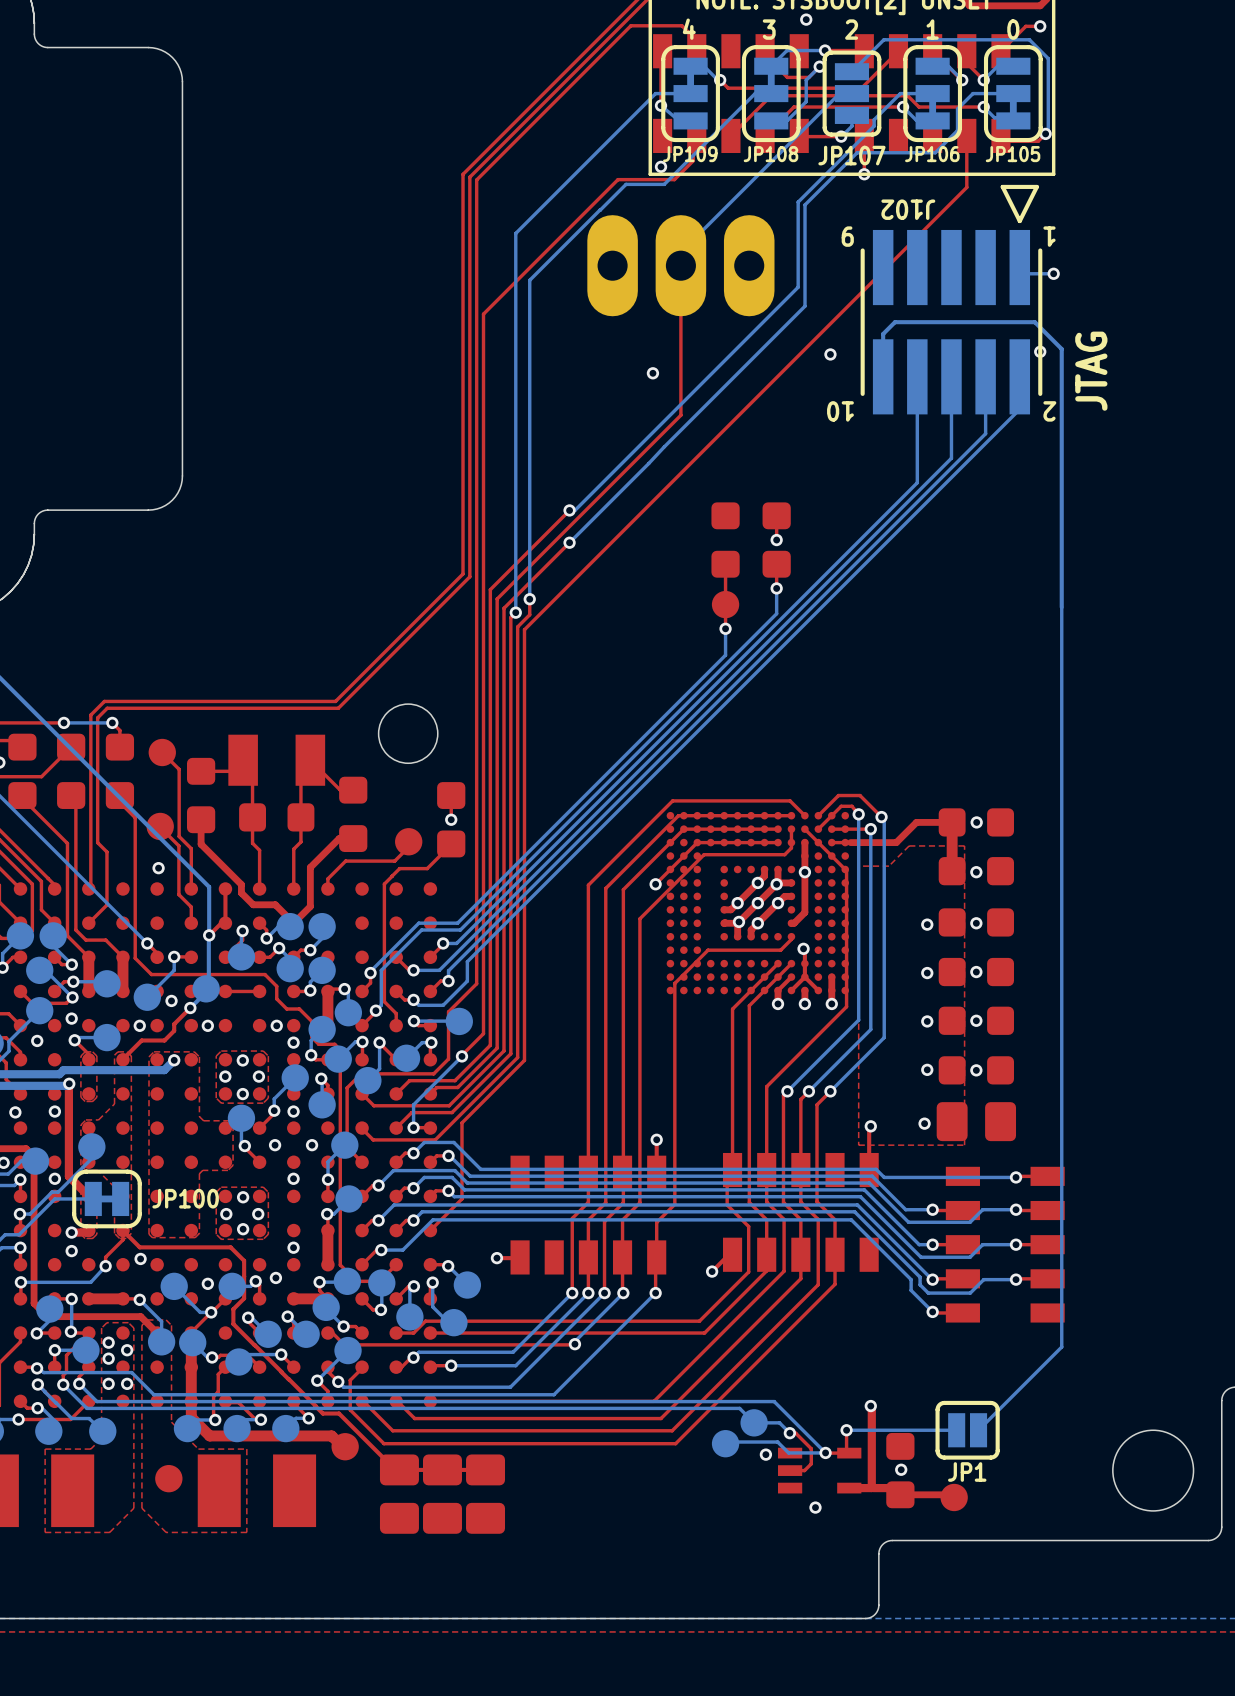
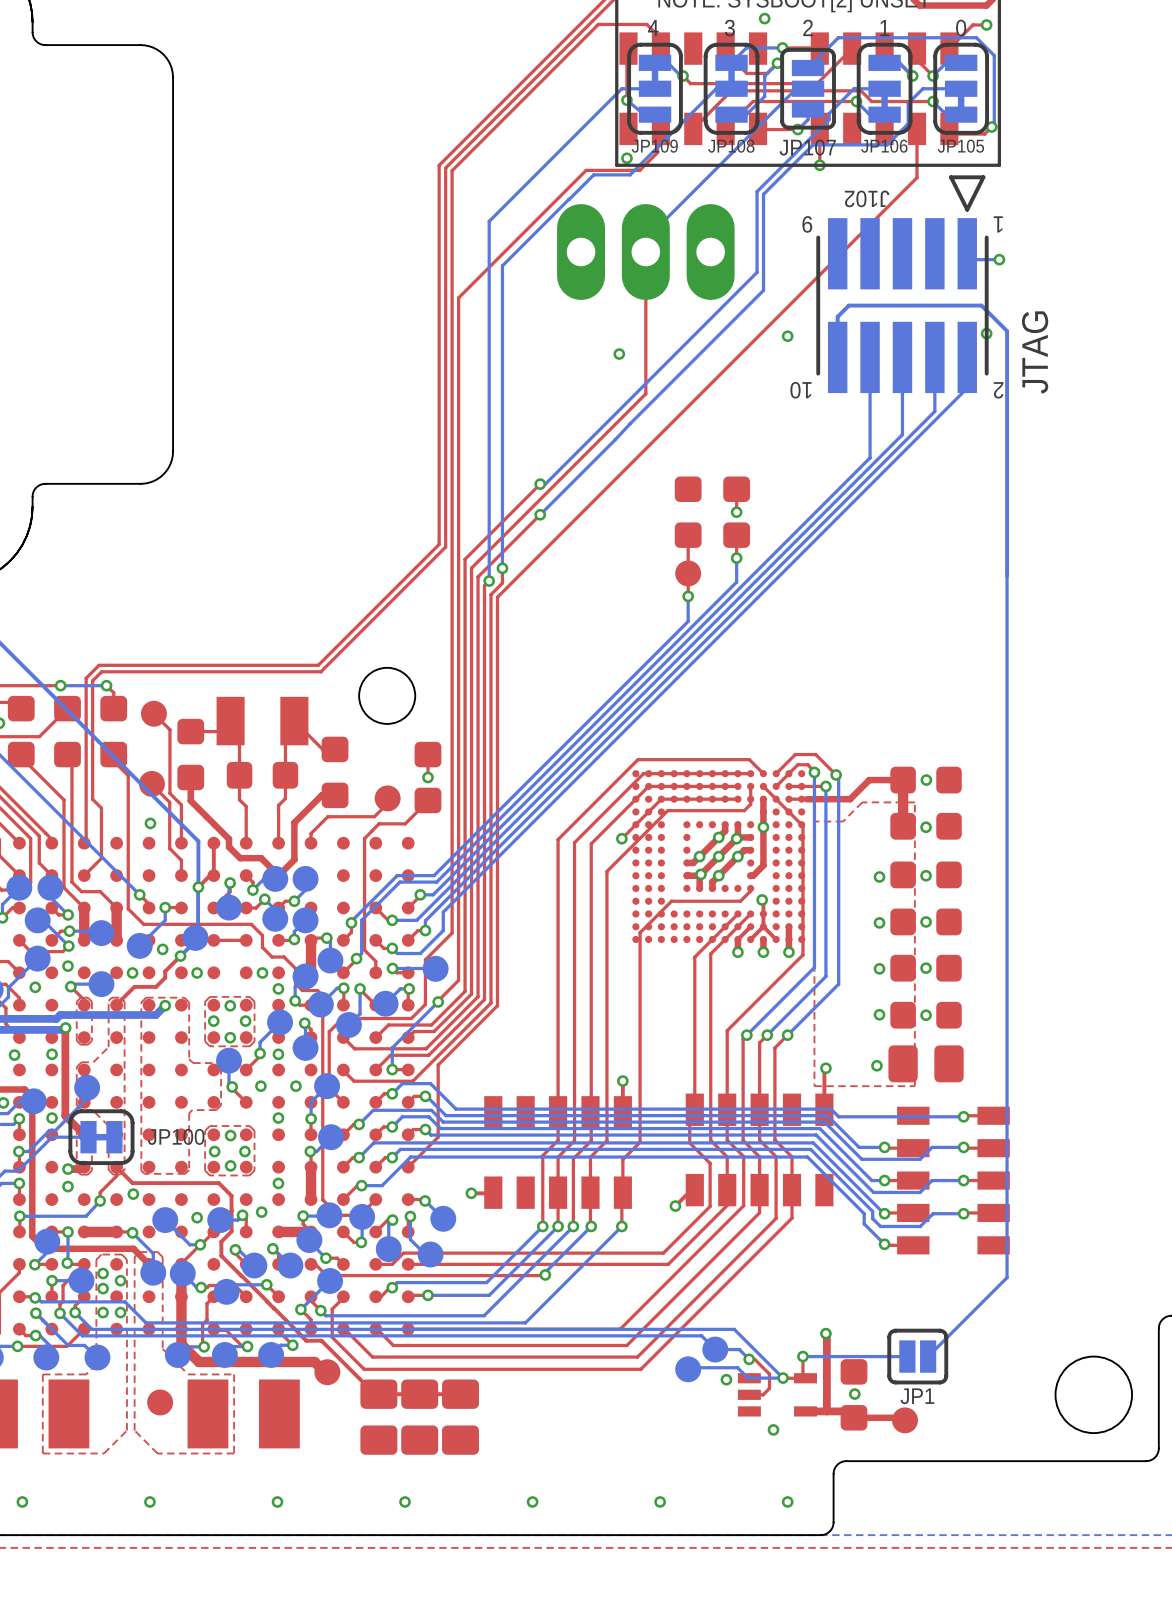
via: none -> (22, 1501)
via: none -> (149, 1501)
via: none -> (277, 1501)
via: none -> (405, 1501)
via: none -> (532, 1501)
via: none -> (660, 1501)
via: none -> (787, 1501)

